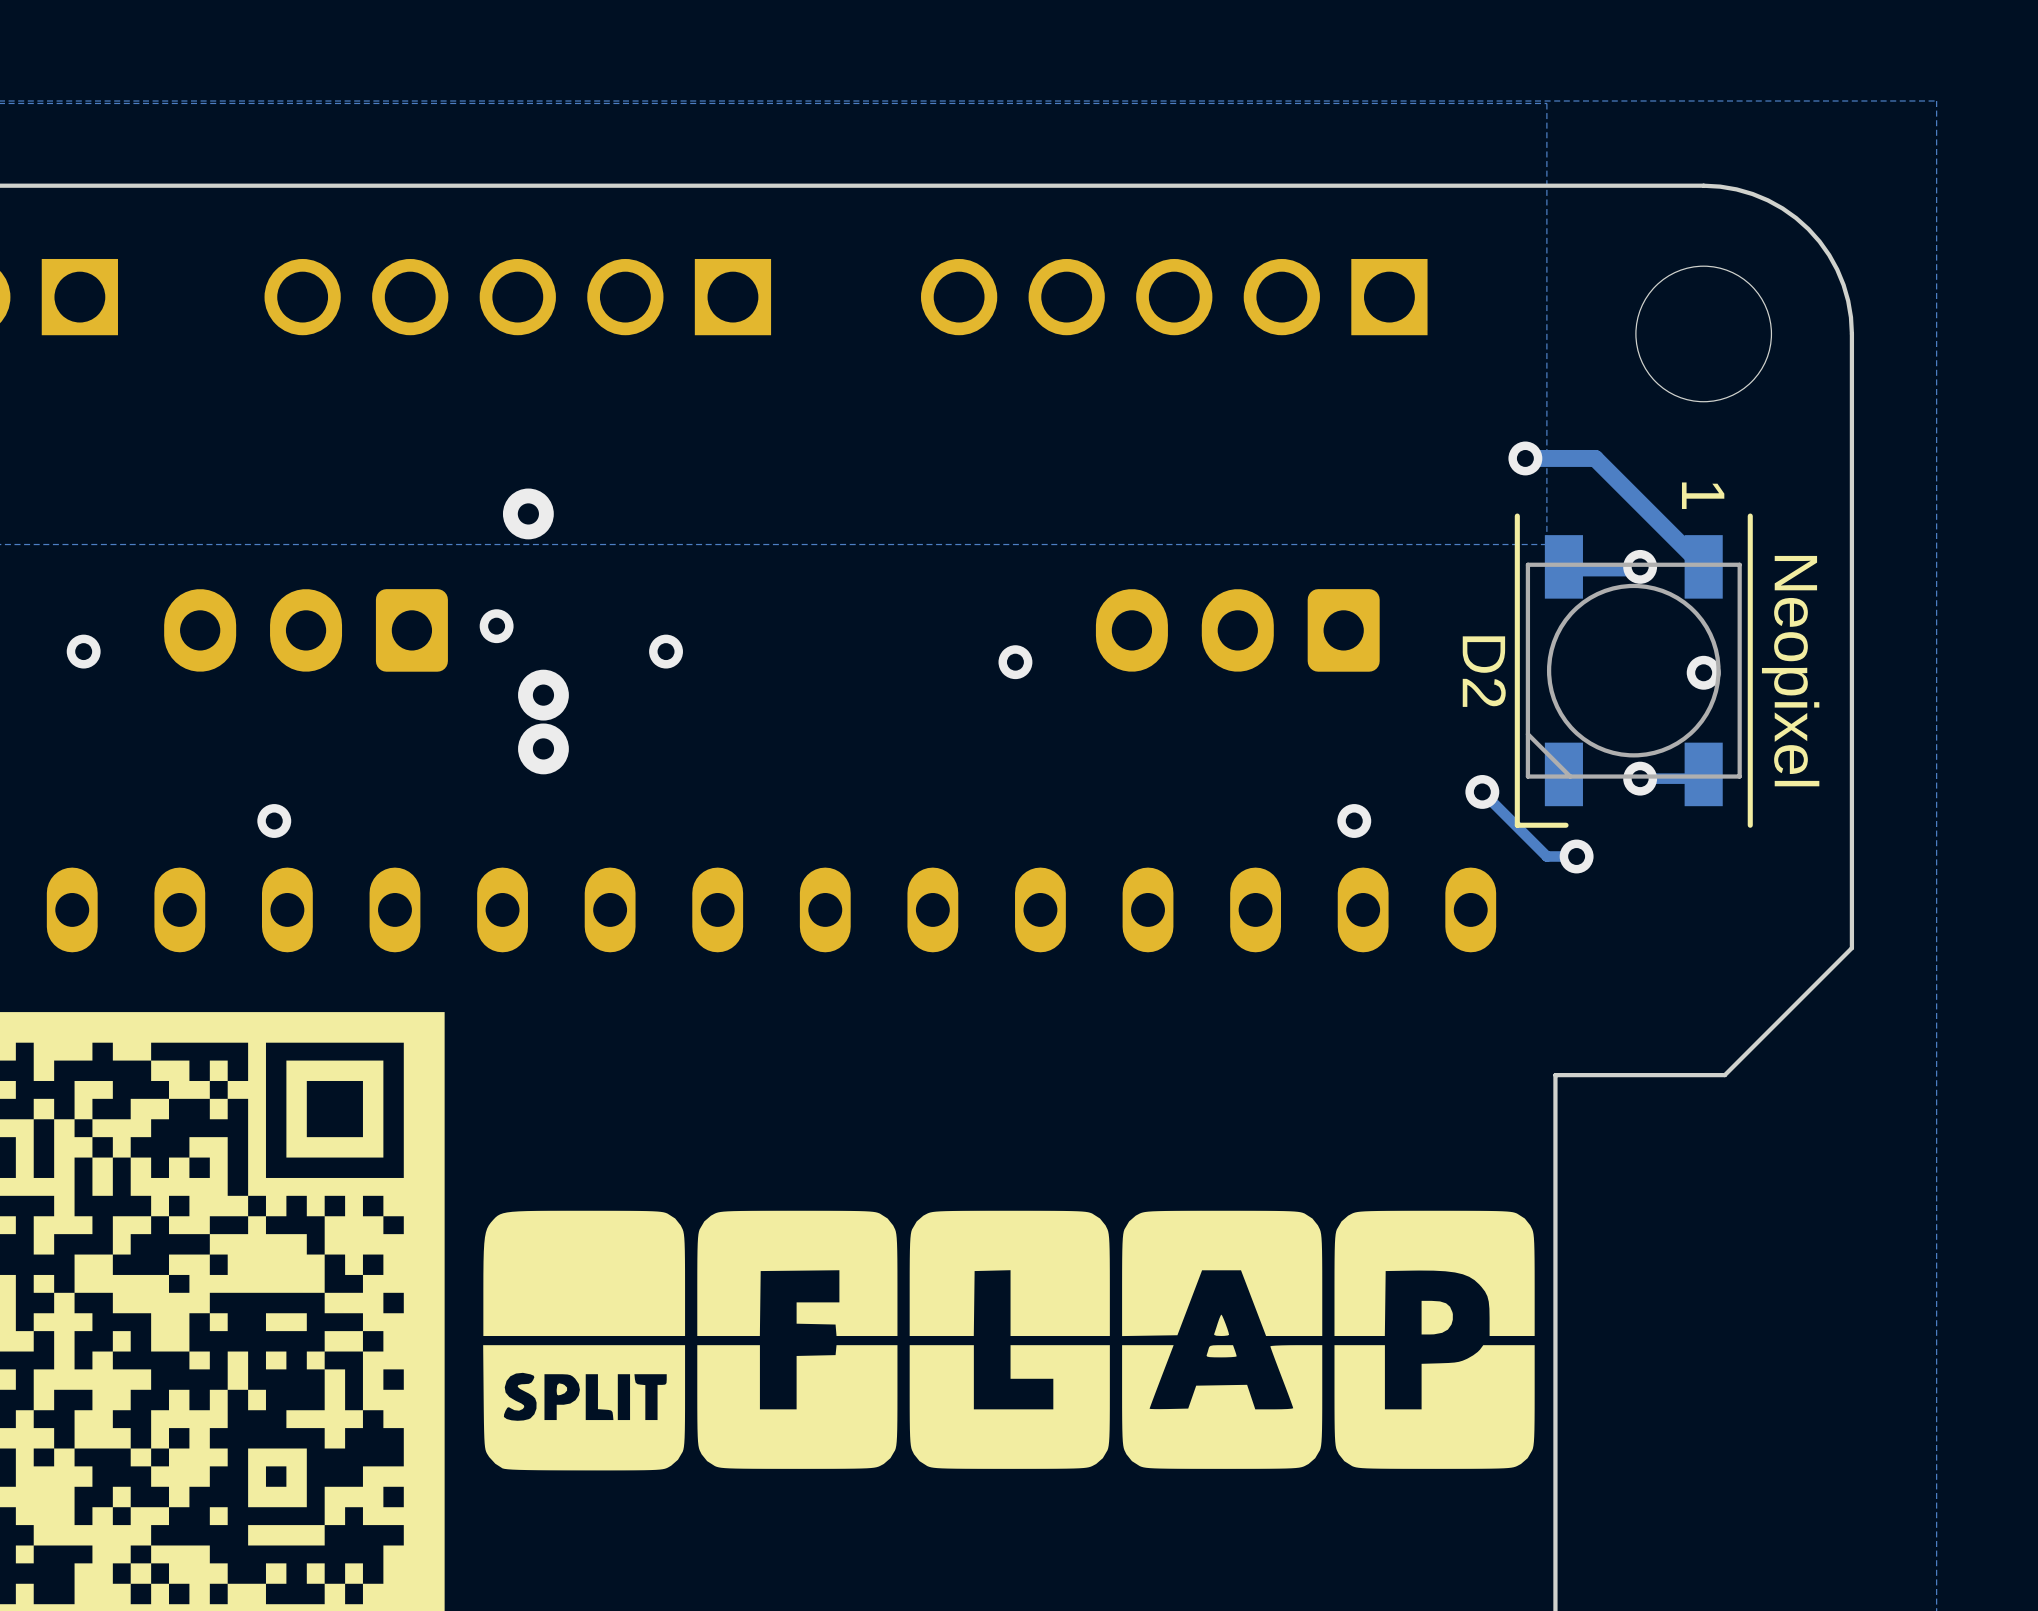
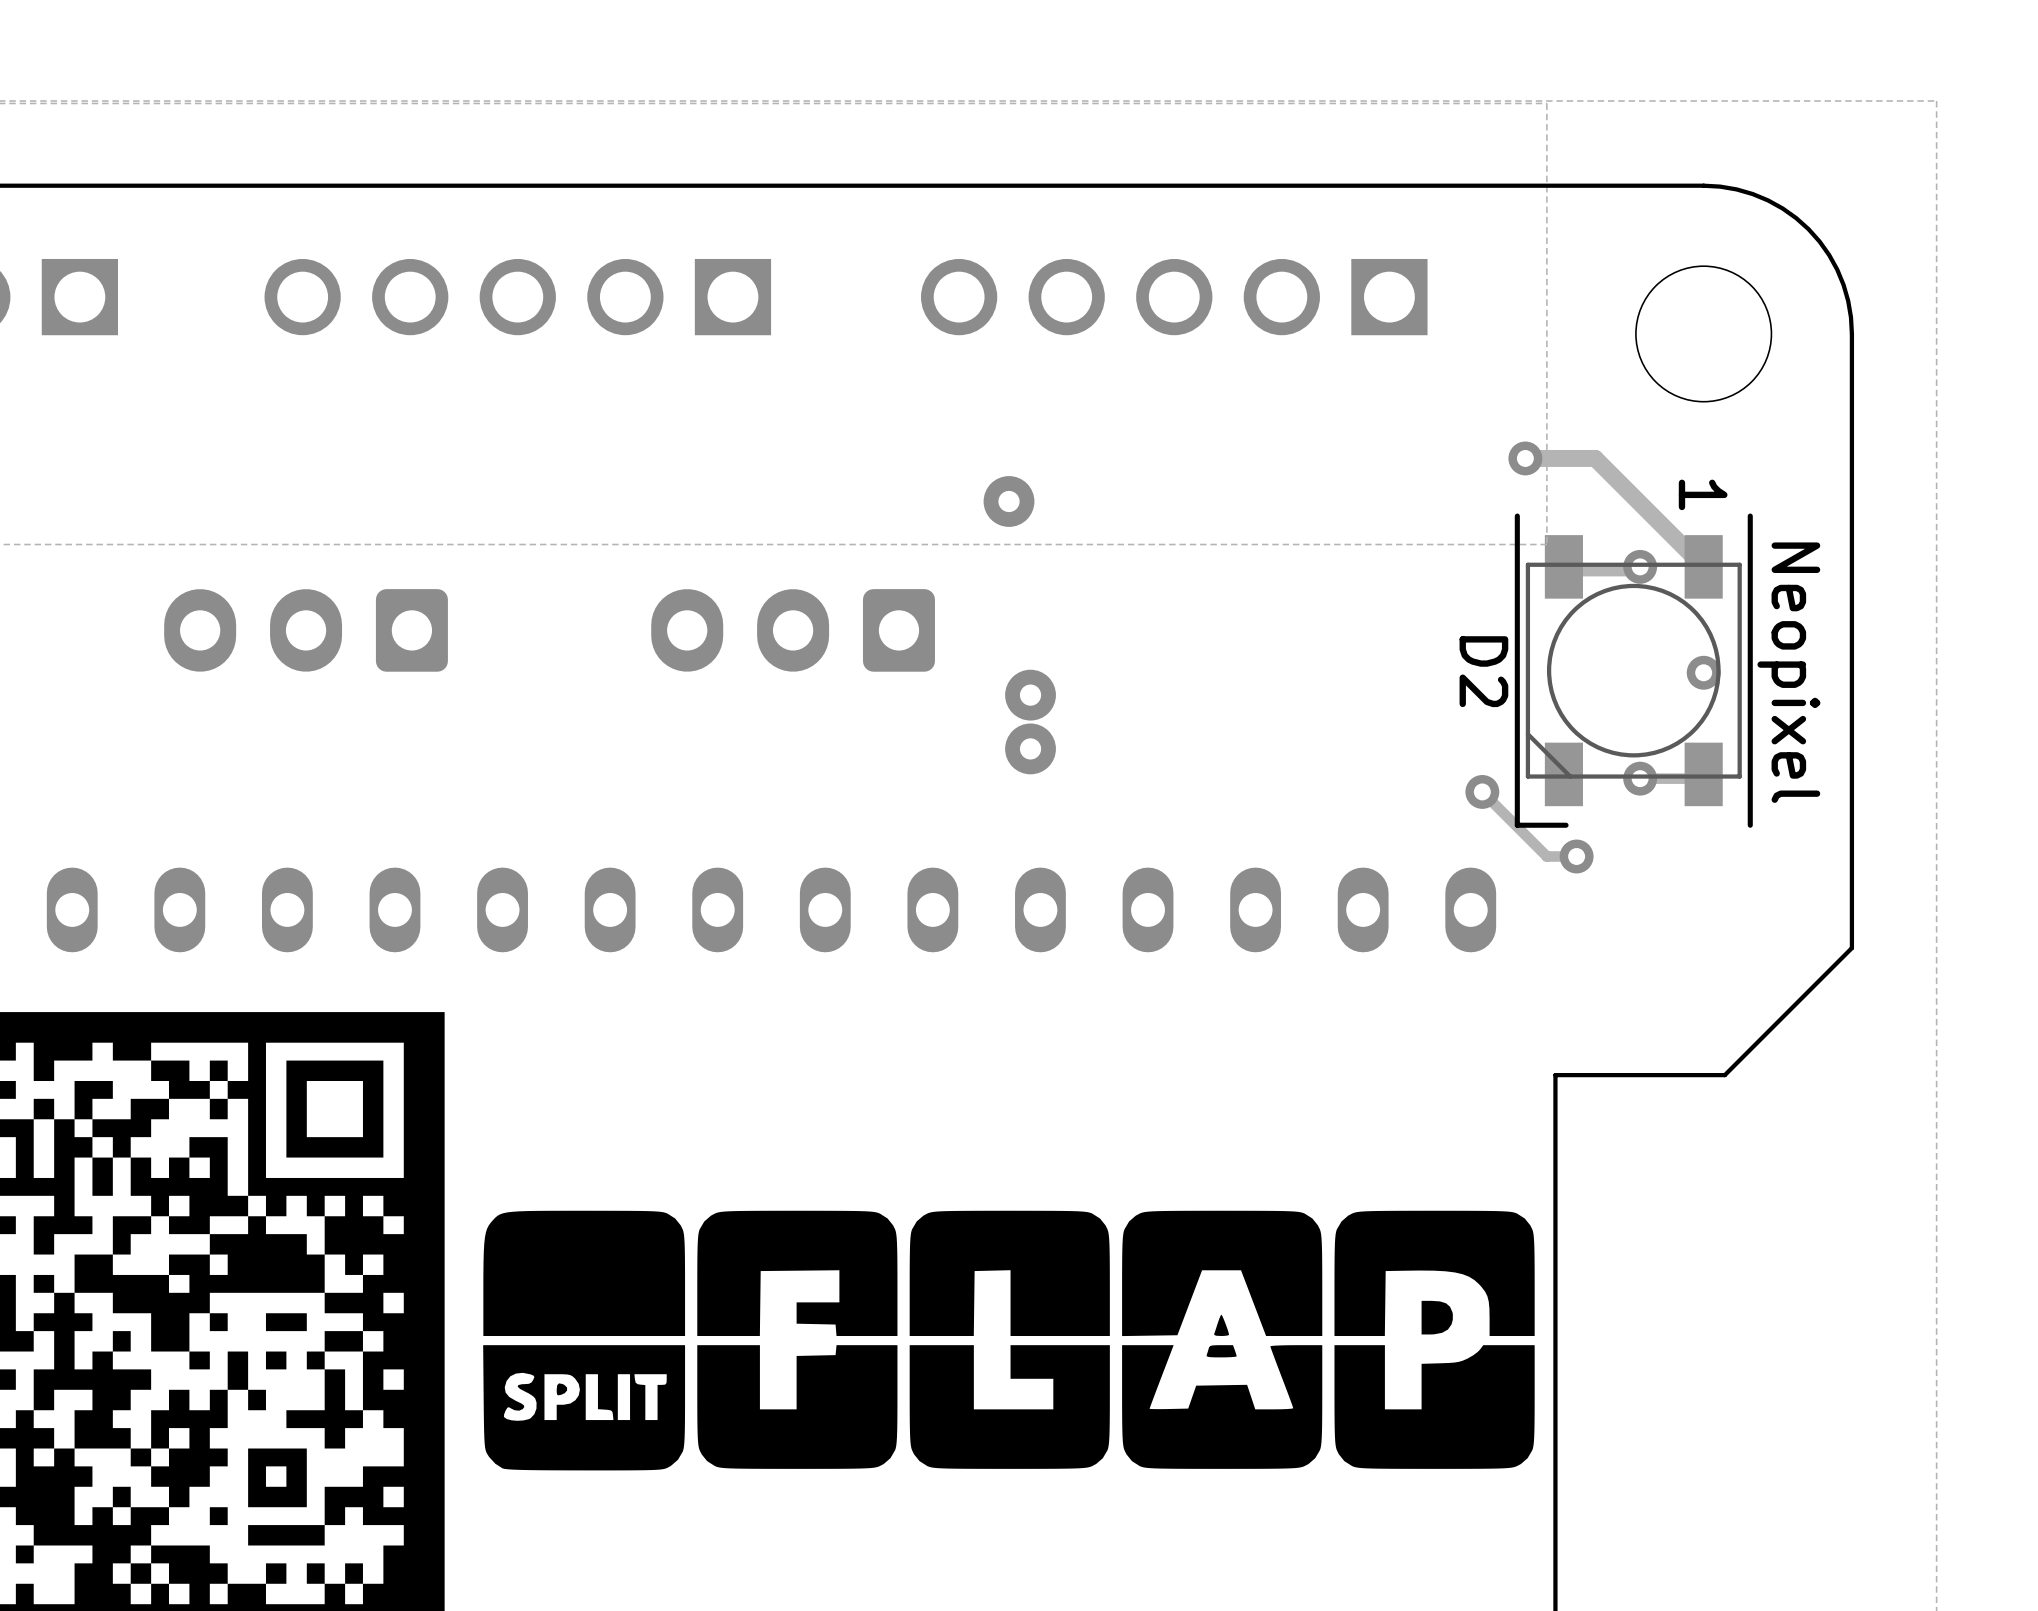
via: none -> (1009, 501)
via: (528, 513) -> none
via: (496, 626) -> none
part position: (1237, 630) -> (793, 630)
via: (83, 651) -> none
via: (666, 651) -> none
via position: (1015, 662) -> (1030, 695)
via: (543, 695) -> none
via: (543, 748) -> none
via: none -> (1030, 748)
via: (274, 821) -> none
via: (1354, 821) -> none

